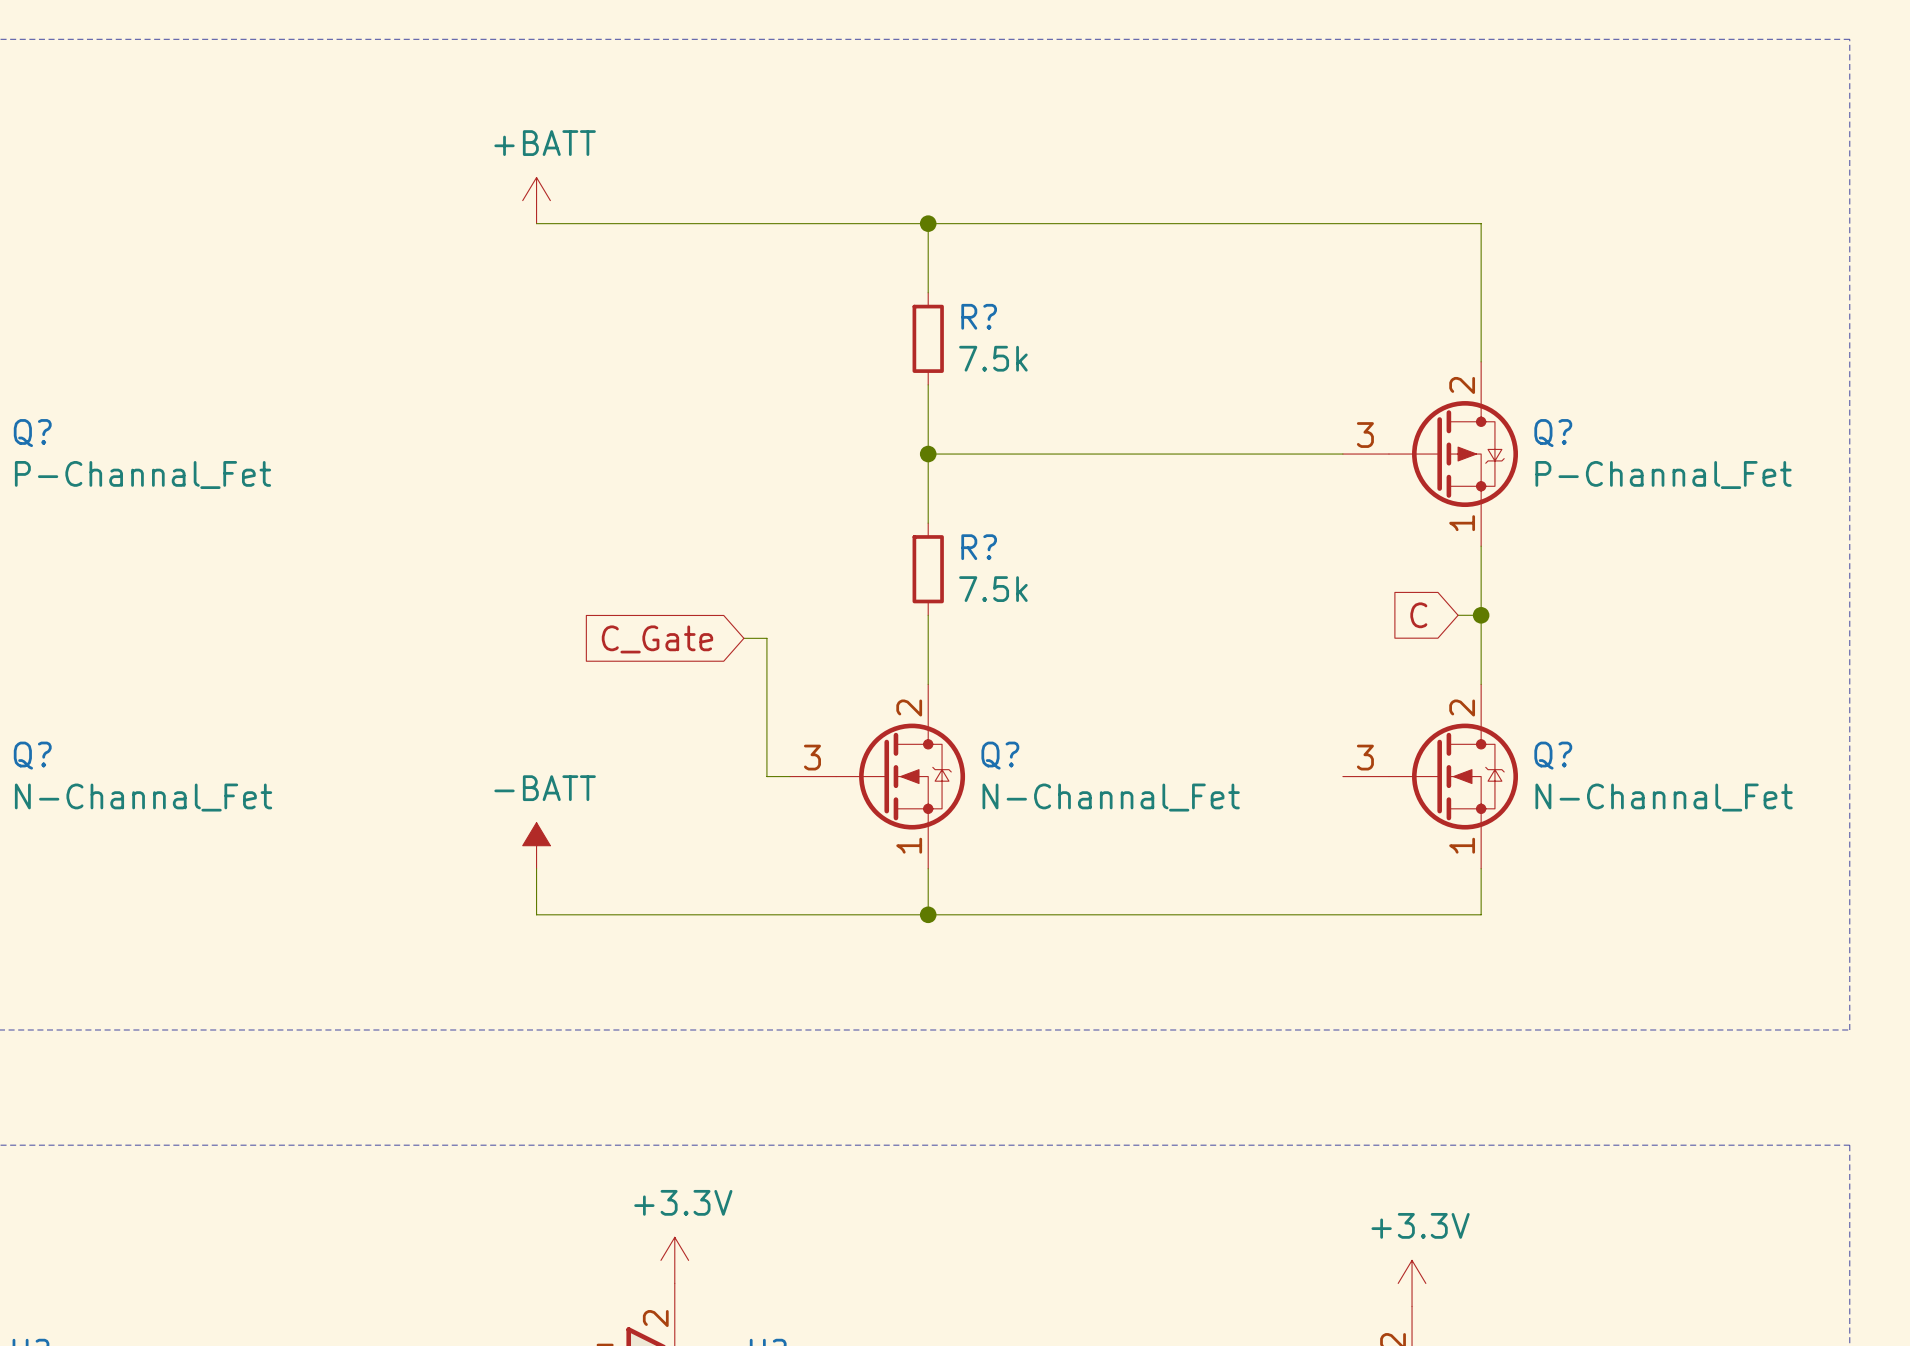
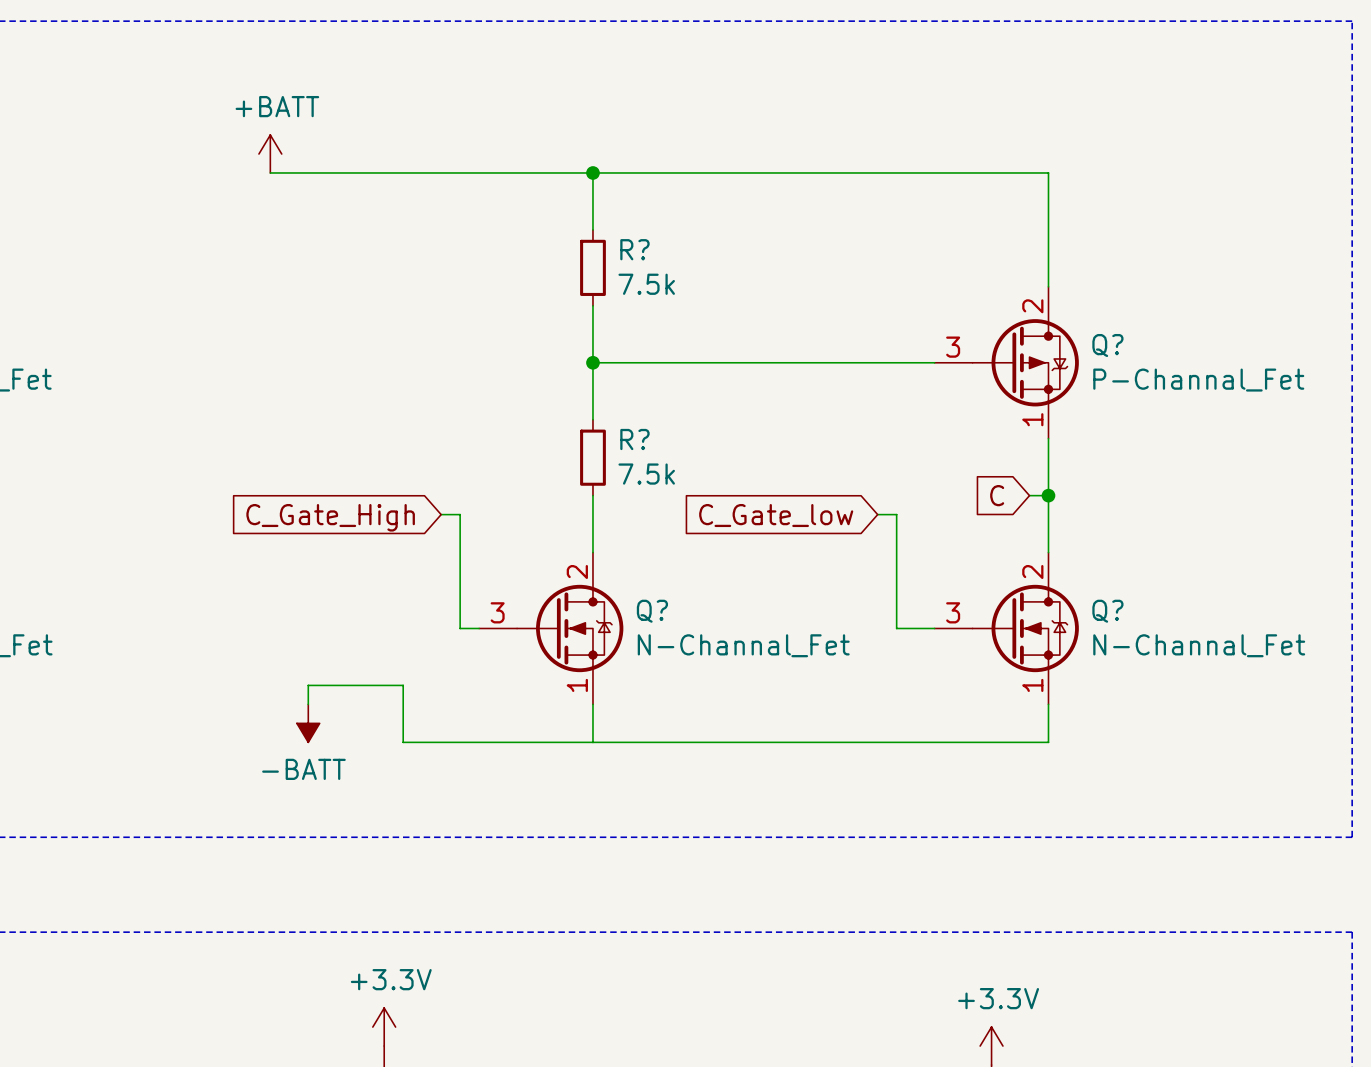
wire: none -> (877, 514) (896, 514) (896, 628) (934, 628)
global label: C_Gate (657, 639) -> C_Gate_High (330, 517)
global label: none -> C_Gate_low (776, 515)
power symbol rotation: 0° (536, 845) -> 180° (308, 723)
power symbol position: -BATT (536, 845) -> -BATT (308, 723)
wire: (536, 868) (536, 914) (697, 914) -> (308, 704) (308, 685) (403, 685) (403, 742)
junction: (928, 914) -> none

